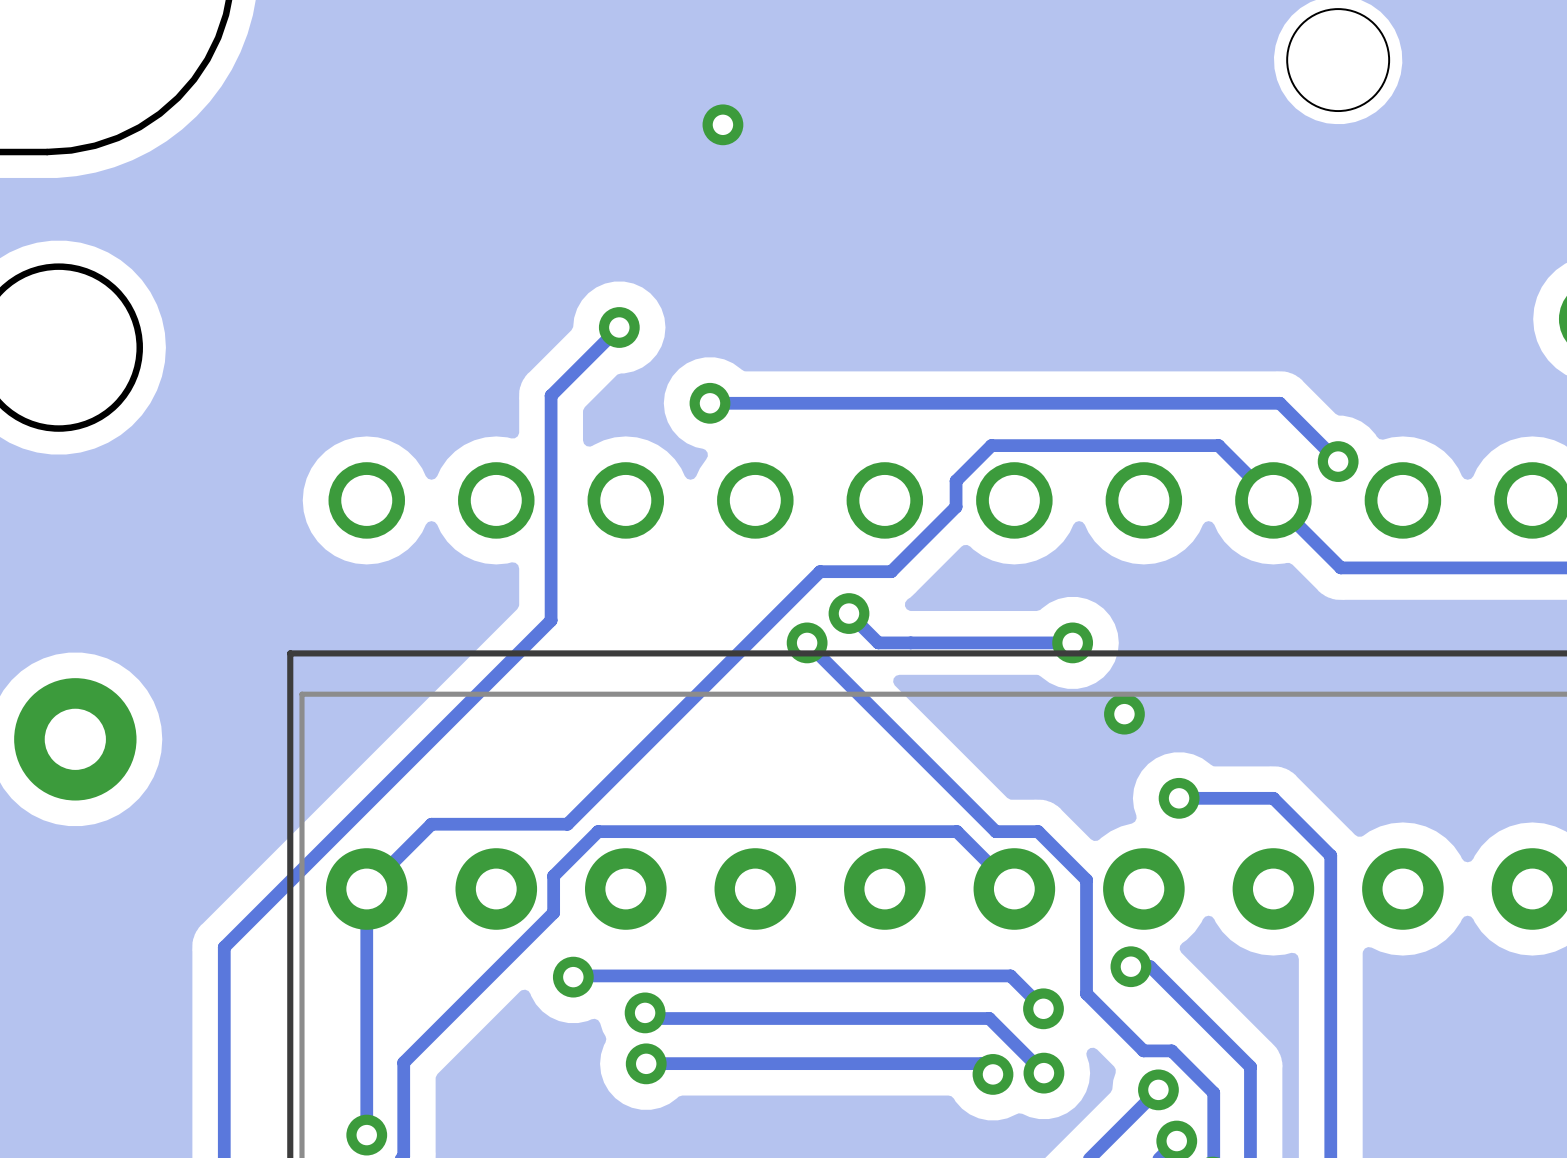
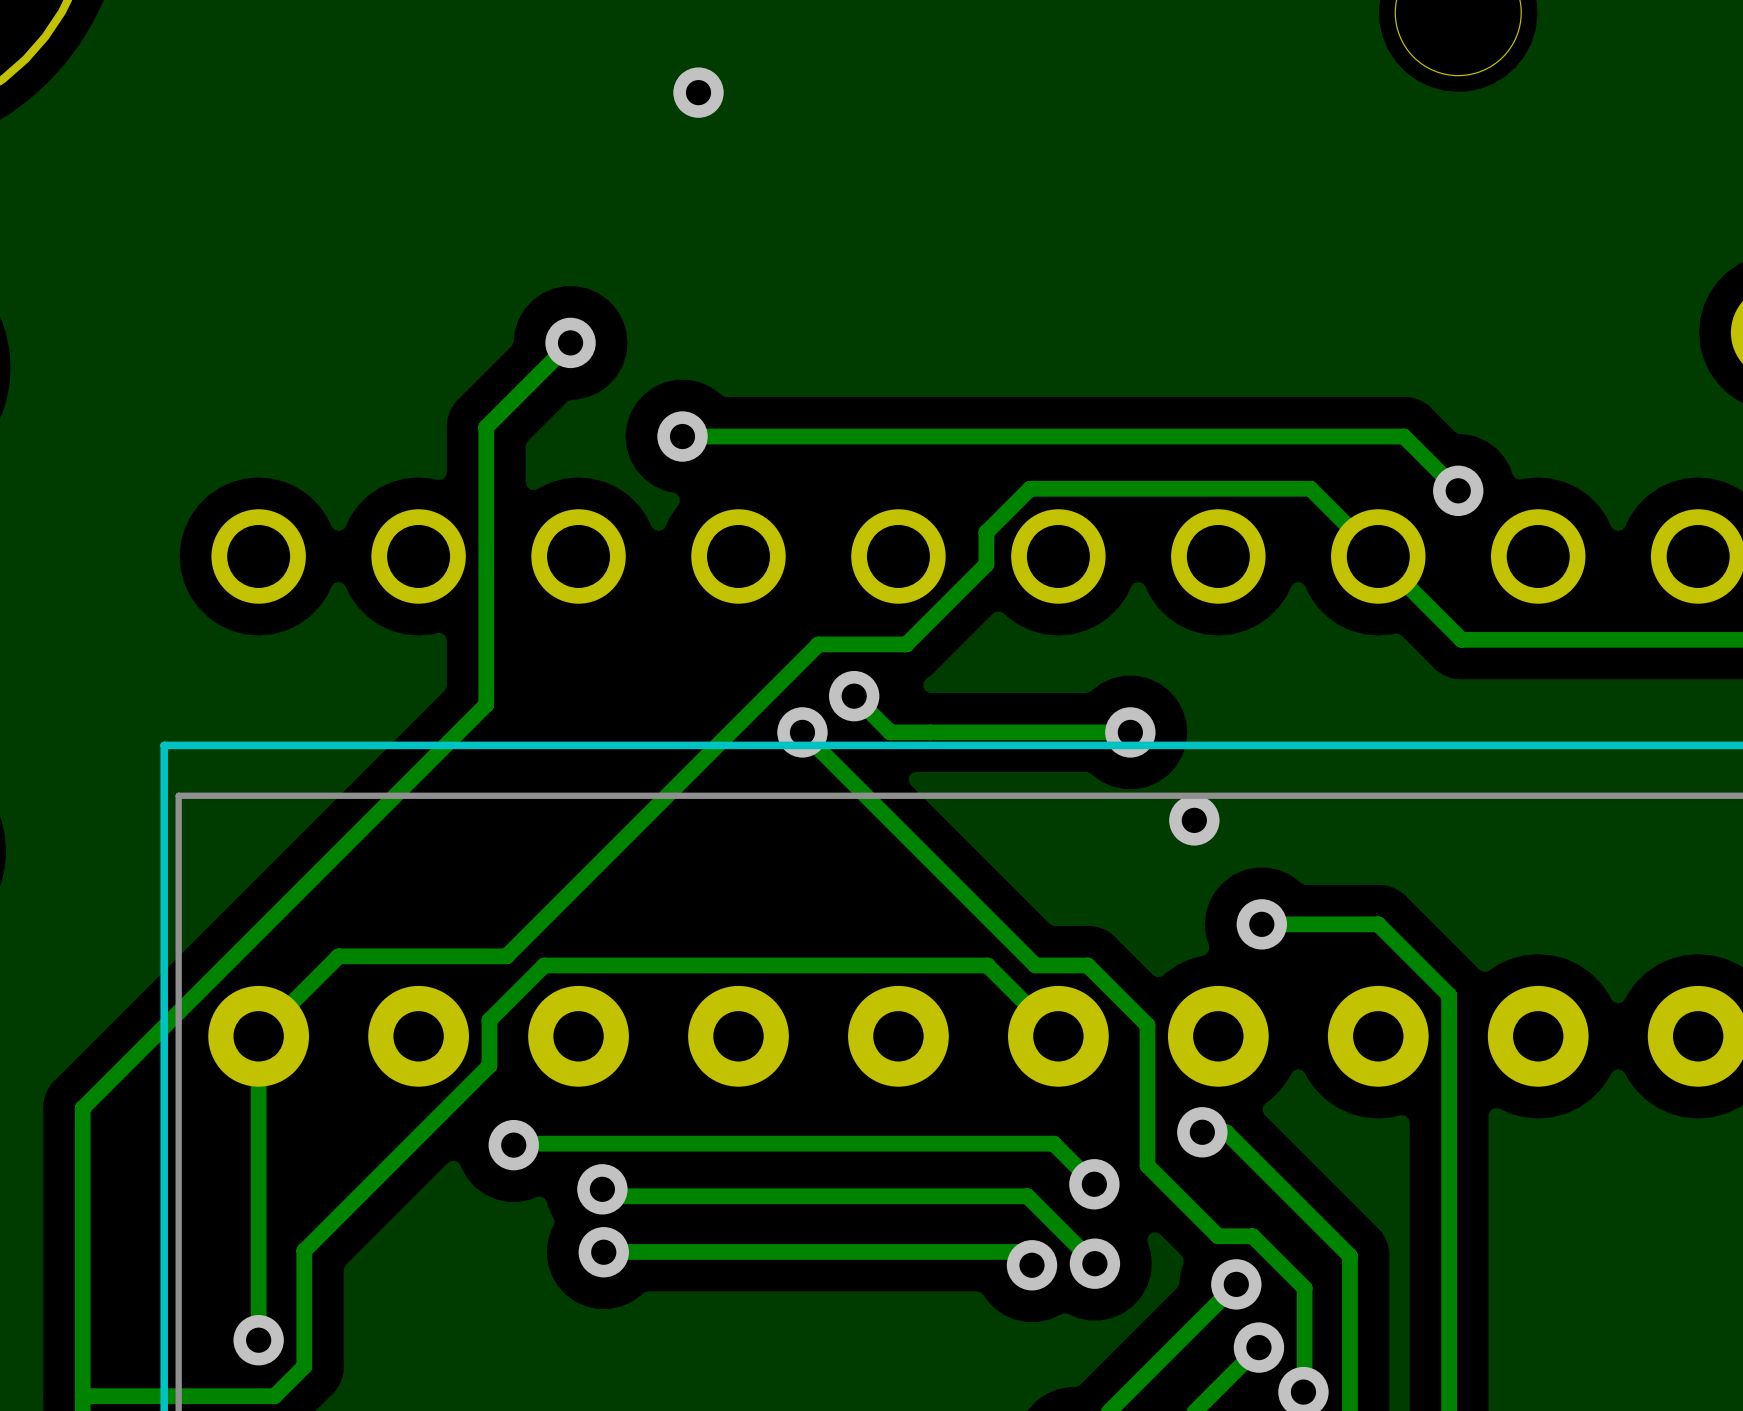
track: (1279, 403) (1338, 461) -> (1386, 436) (1403, 436) (1458, 490)
via position: (1338, 461) -> (1458, 490)

